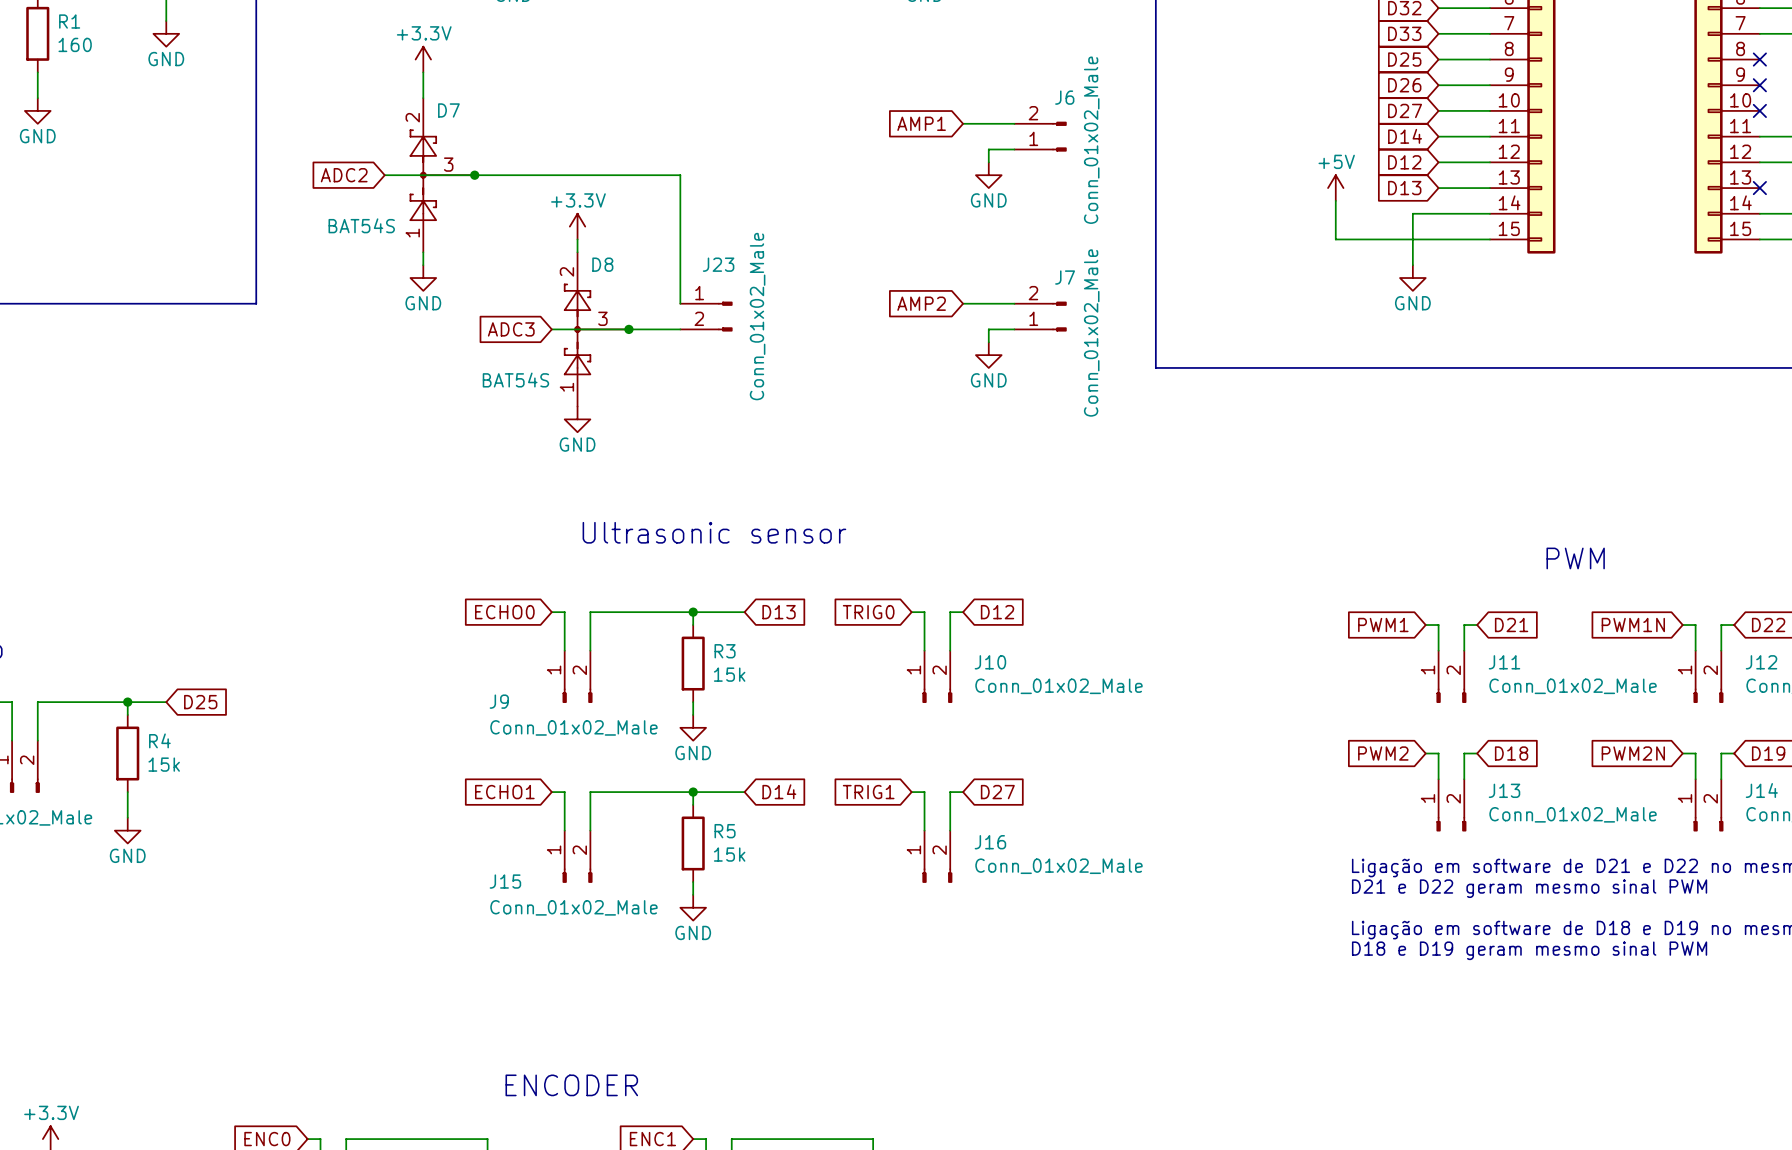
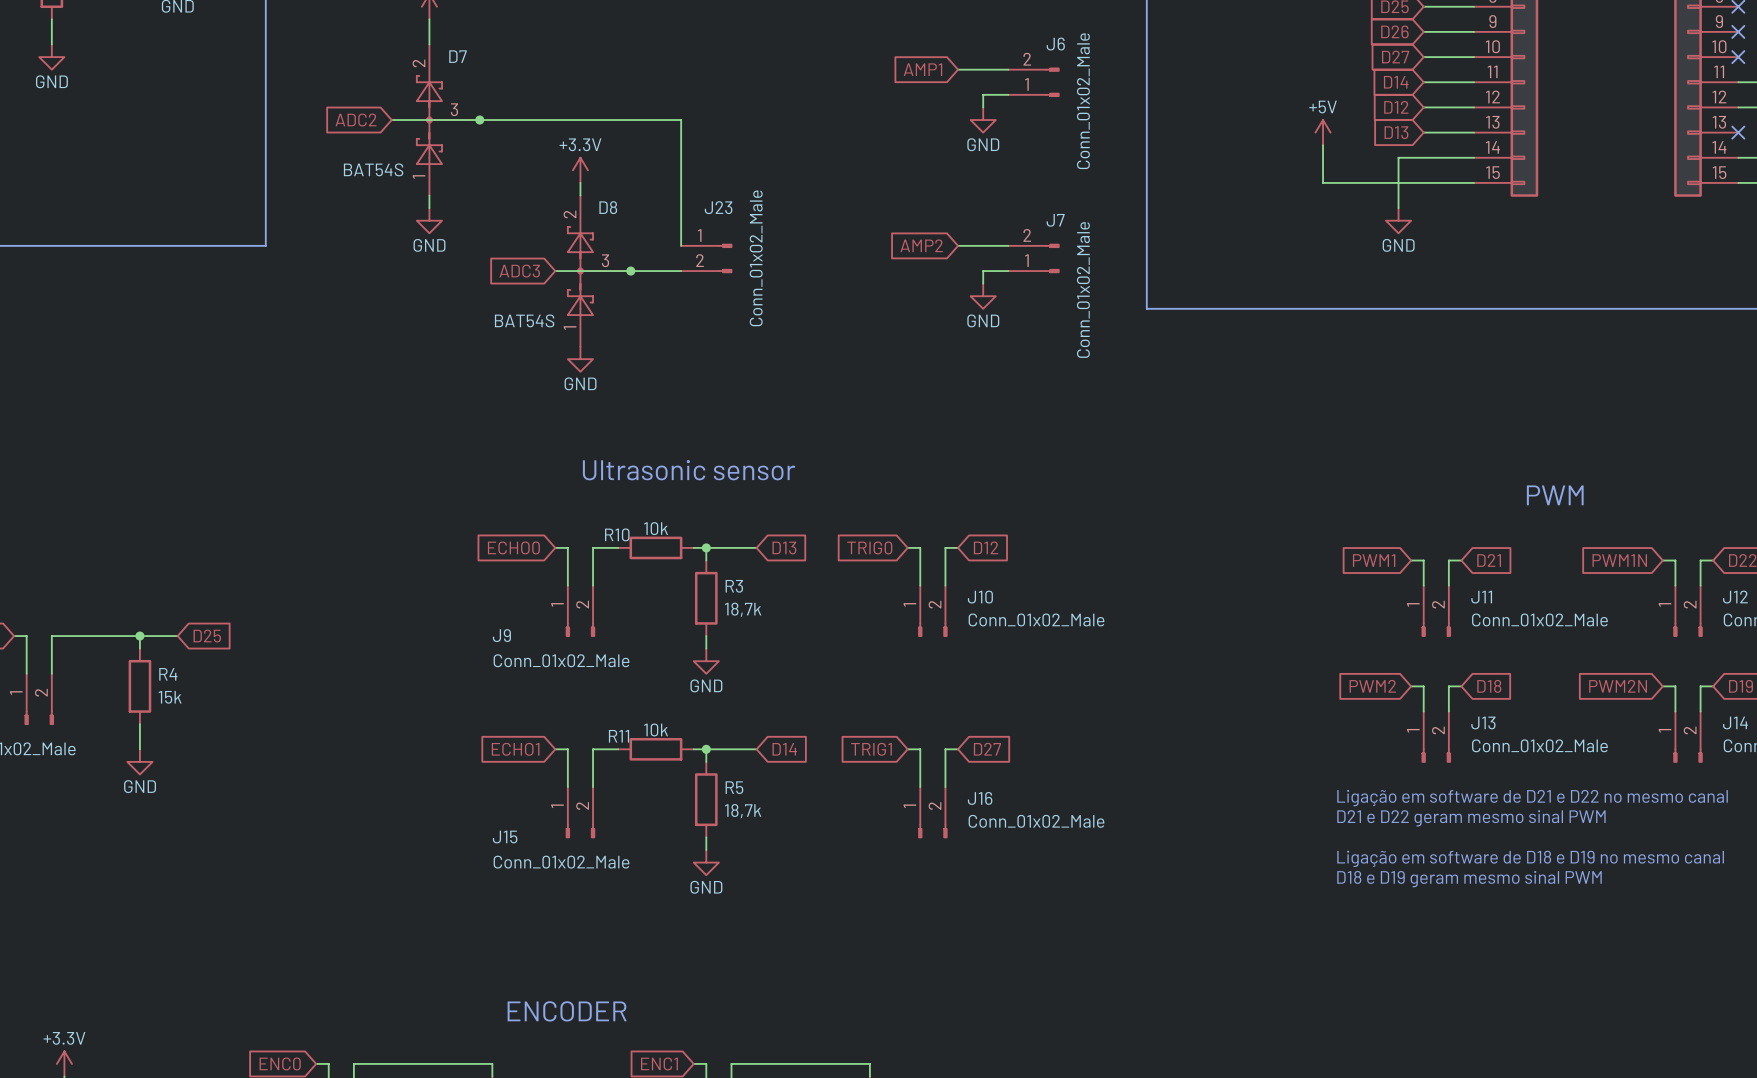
wire: (616, 612) (693, 612) (693, 625) -> none
R10: none -> 10k (655, 547)
junction position: (693, 612) -> (706, 547)
wire: none -> (744, 547) (756, 547)
global label position: D13 (779, 612) -> D13 (784, 548)
R3 position: (693, 663) -> (706, 598)
R3 value: 15k (729, 674) -> 18,7k (743, 609)
wire: (693, 702) (693, 714) -> (706, 547) (706, 560)
wire: none -> (706, 636) (706, 648)
power symbol position: GND (693, 727) -> GND (706, 661)
global label position: D14 (779, 791) -> D14 (784, 749)
global label position: ECHO1 (504, 792) -> ECHO1 (515, 749)
wire: (551, 792) (564, 792) (564, 817) -> (555, 749) (567, 749)
wire: (693, 792) (693, 804) -> (706, 749) (706, 761)
junction position: (693, 792) -> (706, 749)
wire: (744, 792) (590, 792) (590, 817) -> (618, 749) (593, 749)
global label position: TRIG1 (868, 792) -> TRIG1 (871, 749)
wire: (911, 792) (924, 792) (924, 817) -> (907, 749) (920, 749)
wire: (963, 792) (950, 792) (950, 817) -> (958, 749) (945, 749)
global label position: D27 (997, 792) -> D27 (987, 749)
R11: none -> 10k (655, 749)
wire: none -> (693, 749) (756, 749)
R5 position: (693, 843) -> (706, 799)
R5 value: 15k (729, 854) -> 18,7k (743, 811)
J15 position: (577, 856) -> (580, 812)
J16 position: (937, 856) -> (932, 812)
wire: (693, 882) (693, 894) -> (706, 837) (706, 850)
power symbol position: GND (693, 907) -> GND (706, 862)

